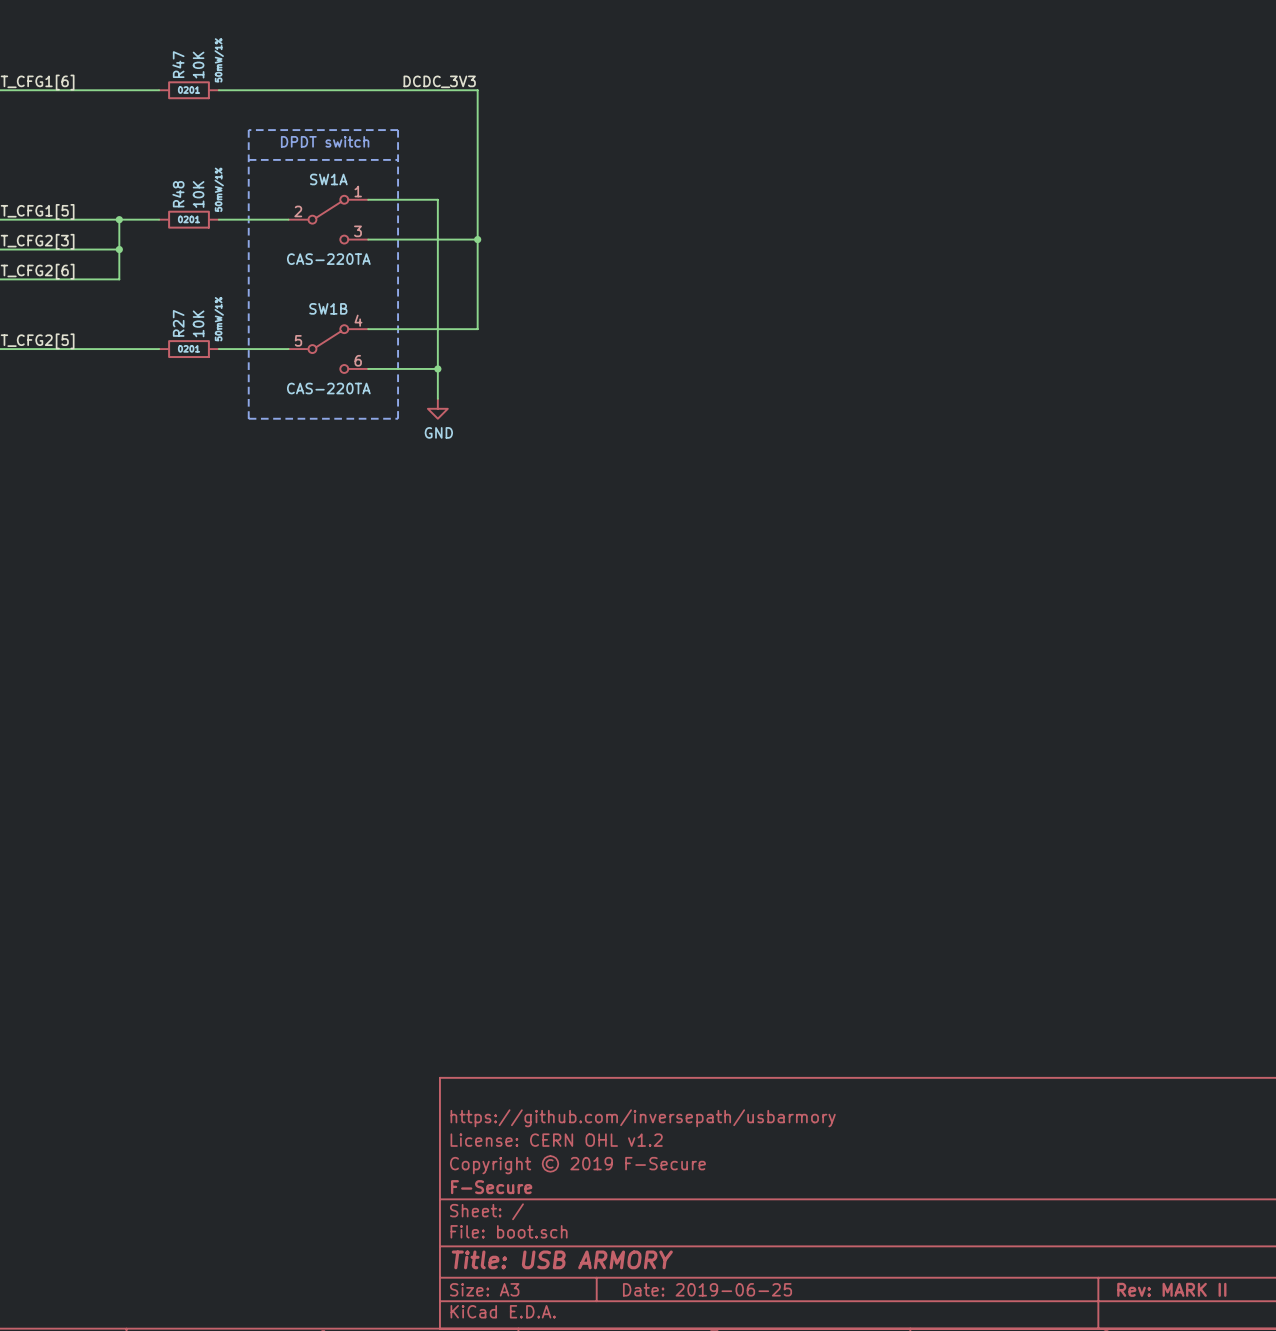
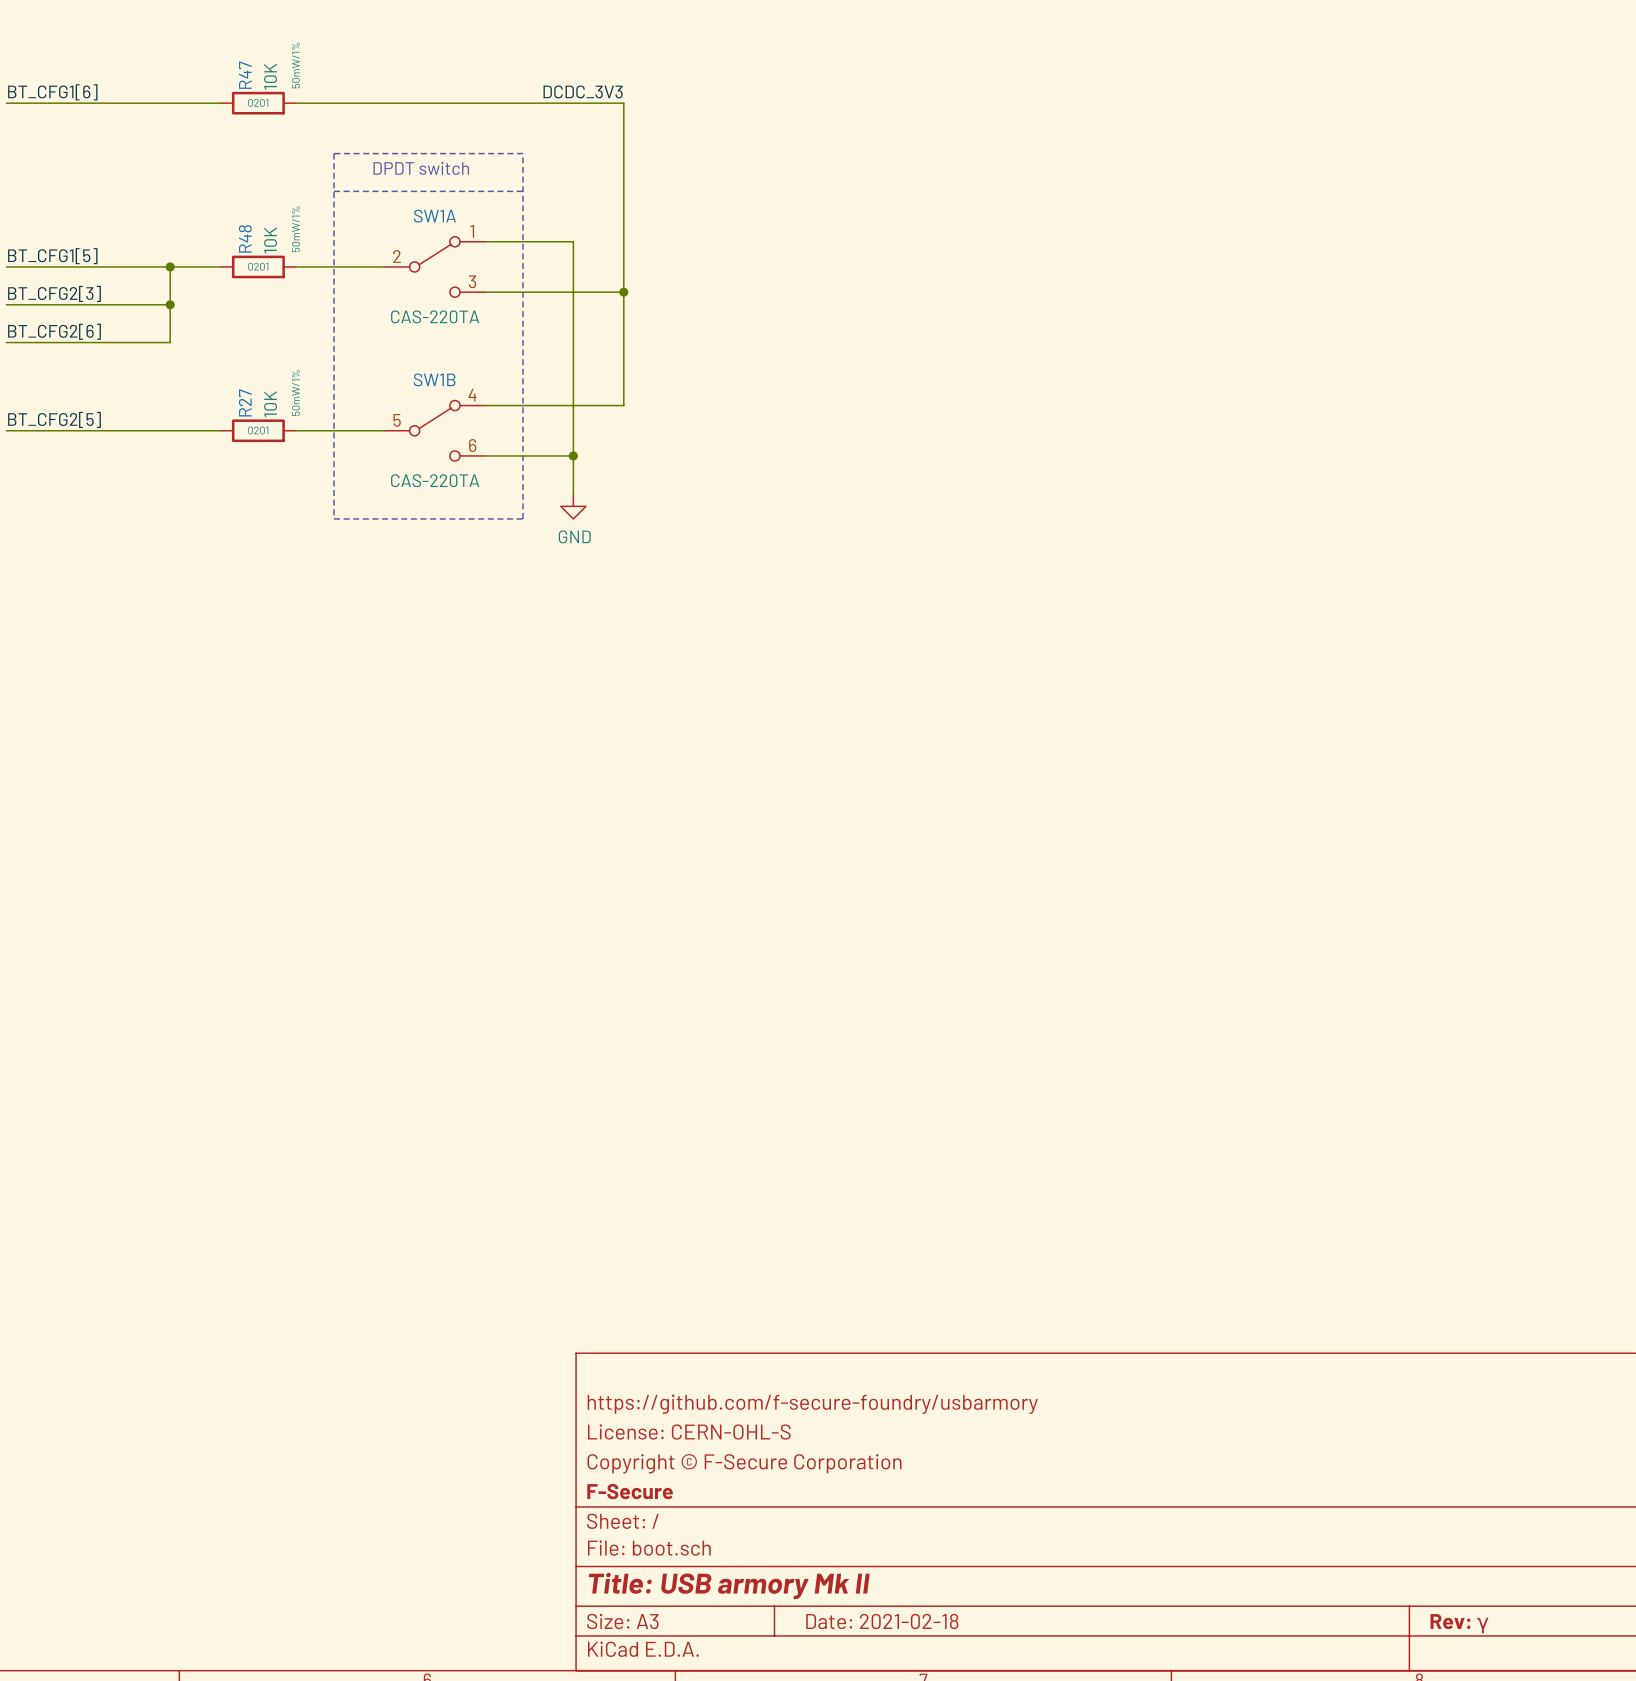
title block: https://github.com/inversepath/usbarmory (643, 1118) -> https://github.com/f-secure-foundry/usbarmory (812, 1404)
title block: License: CERN OHL v1.2 (556, 1140) -> License: CERN-OHL-S (689, 1432)
title block: Copyright © 2019 F-Secure (577, 1164) -> Copyright © F-Secure Corporation (744, 1463)
title block: Title: USB ARMORY (562, 1259) -> Title: USB armory Mk II (729, 1586)
title block: Date: 2019-06-25 (707, 1289) -> Date: 2021-02-18 (882, 1621)
title block: Rev: MARK II (1171, 1289) -> Rev: γ (1459, 1623)

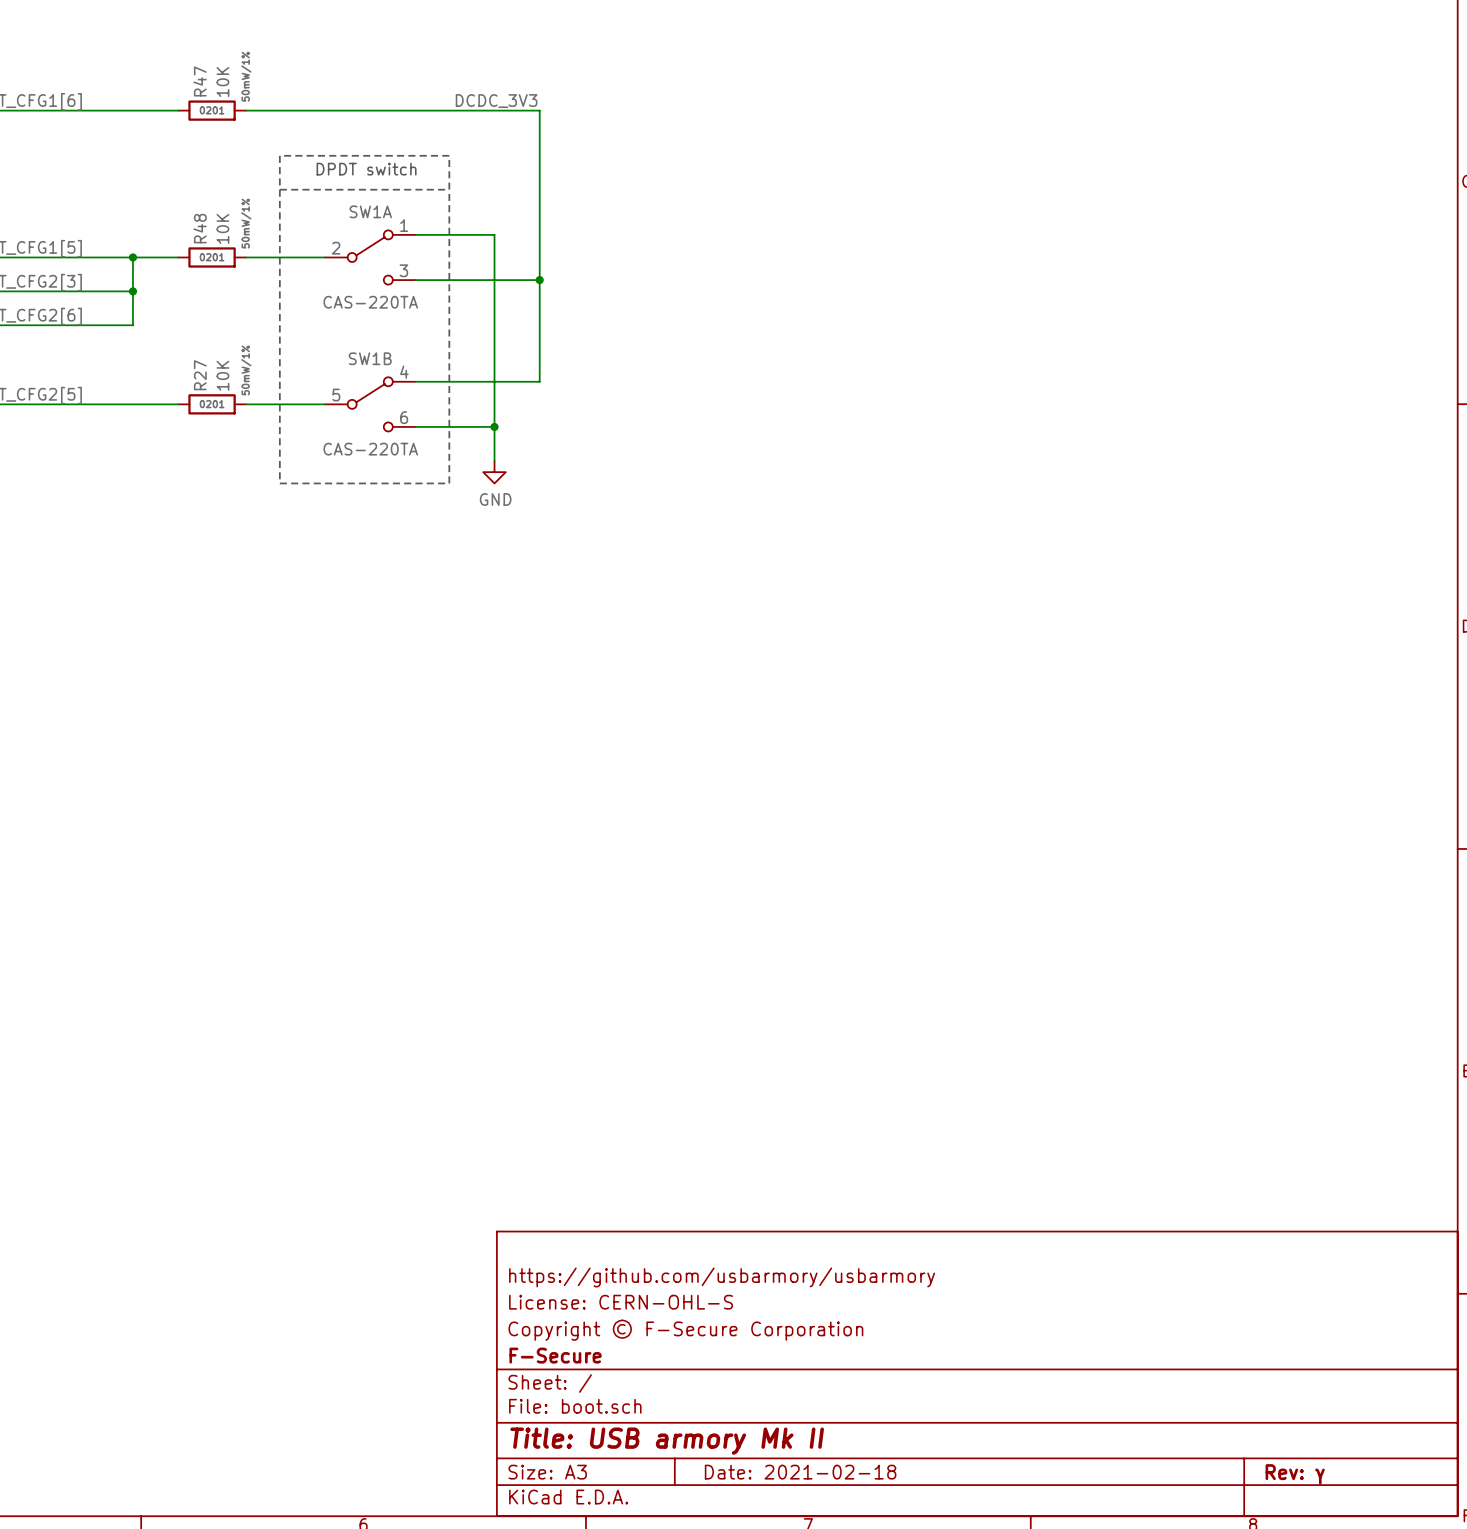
title block: https://github.com/f-secure-foundry/usbarmory (812, 1404) -> https://github.com/usbarmory/usbarmory (722, 1277)

